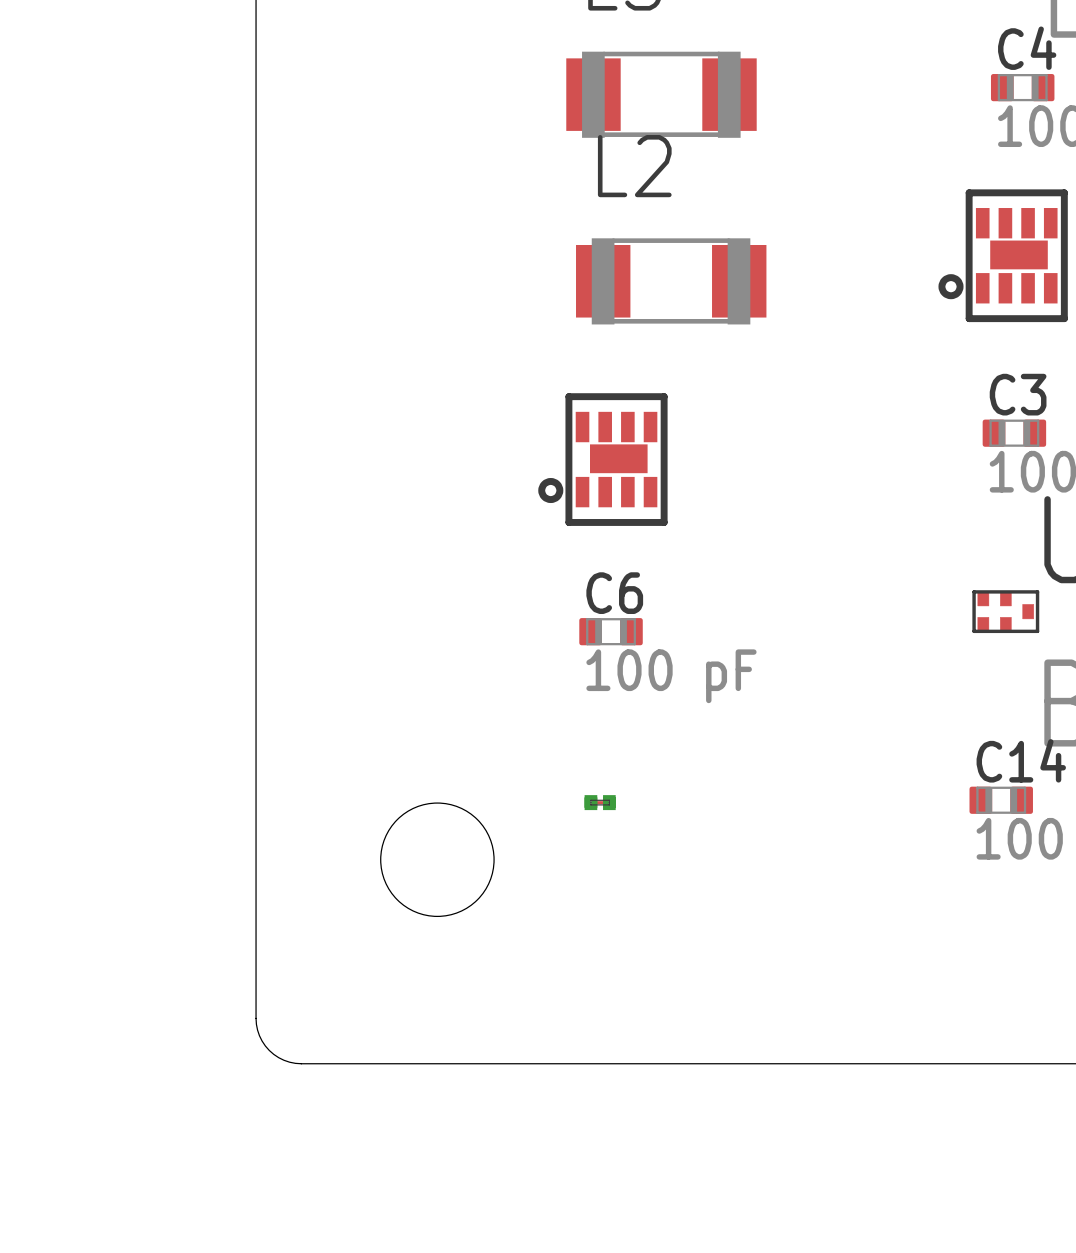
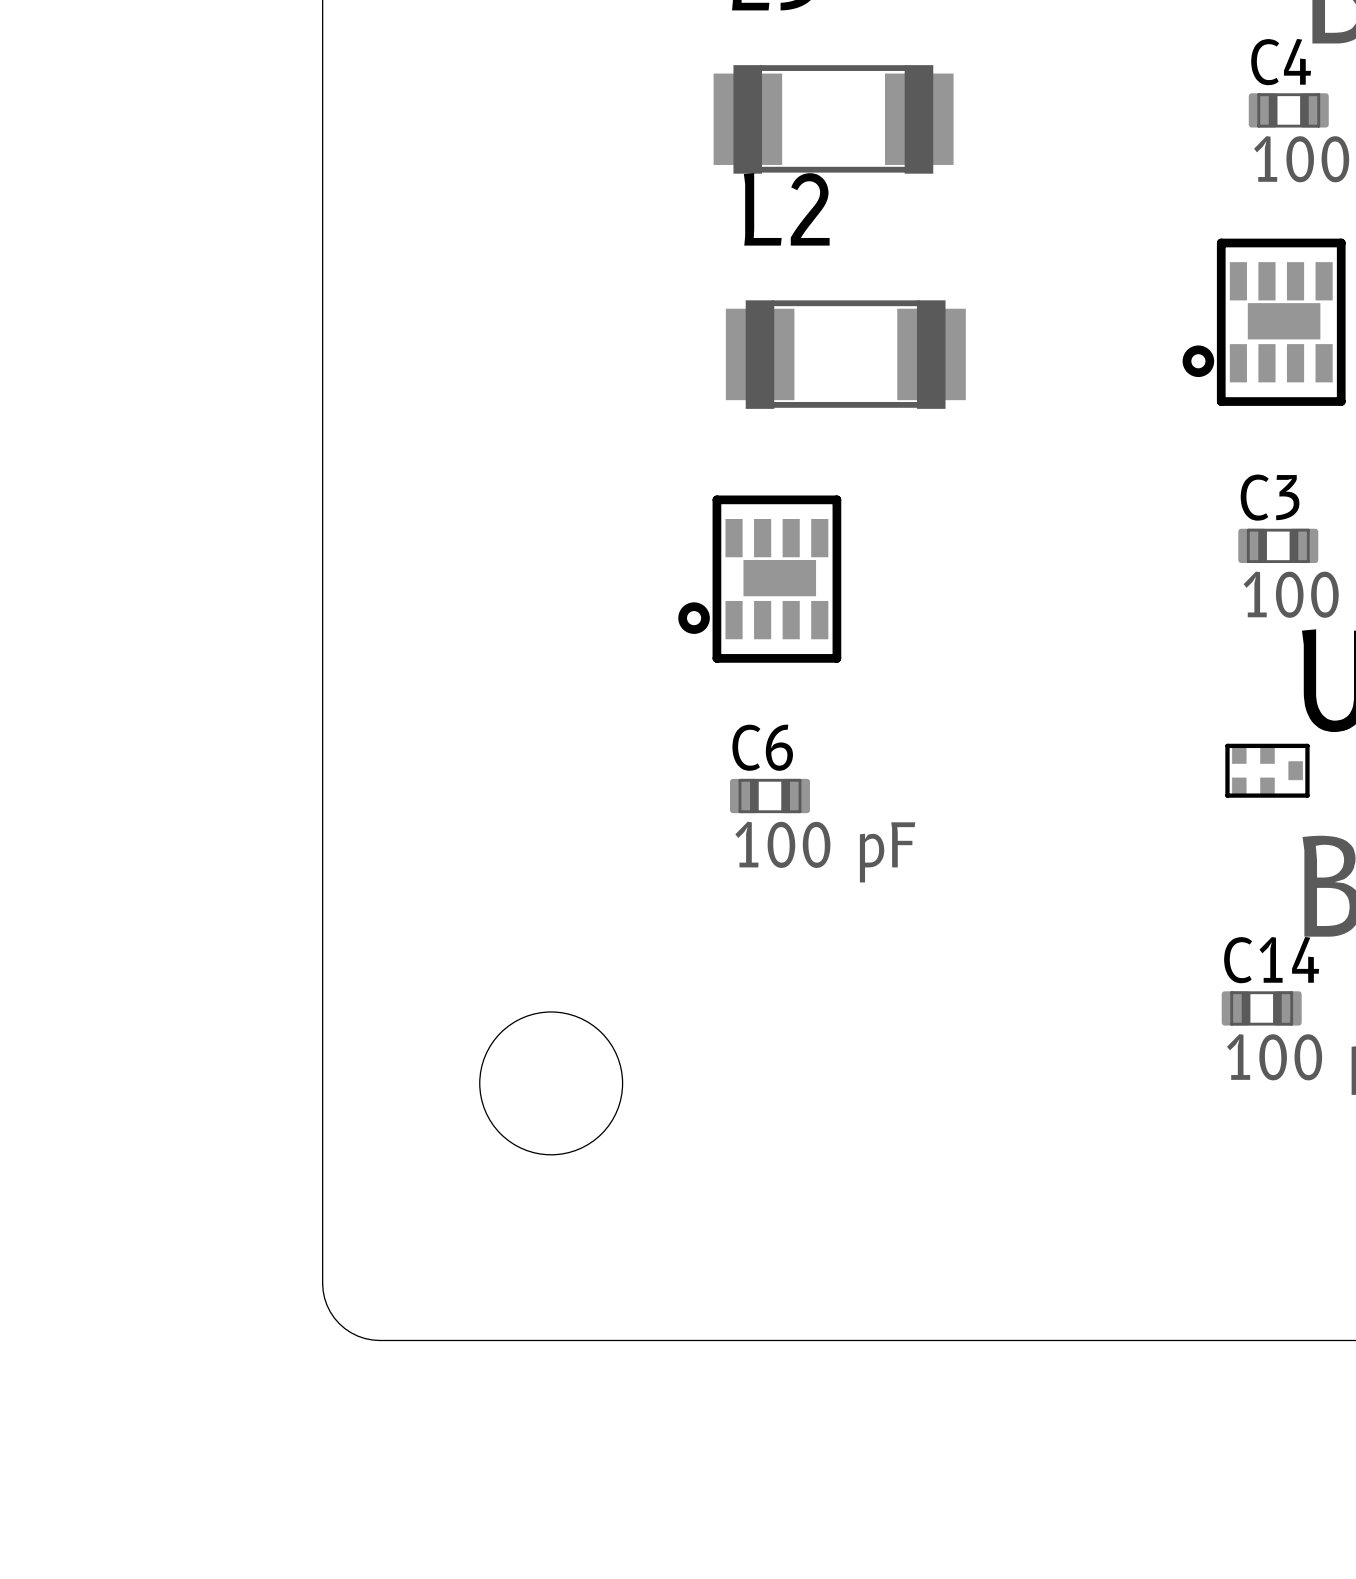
part: (600, 802) -> none

